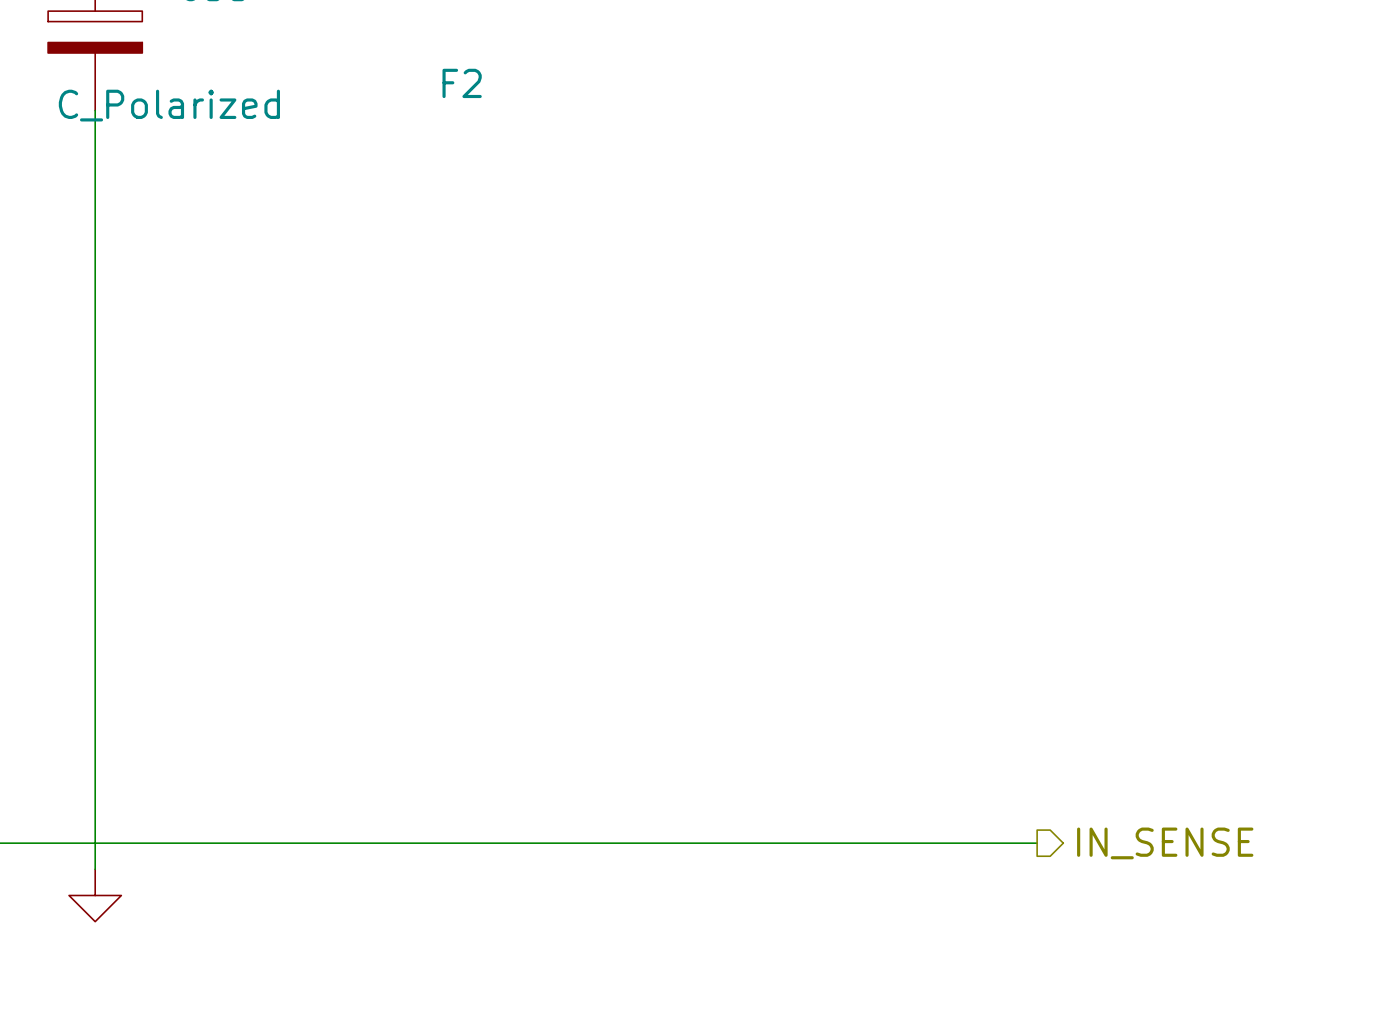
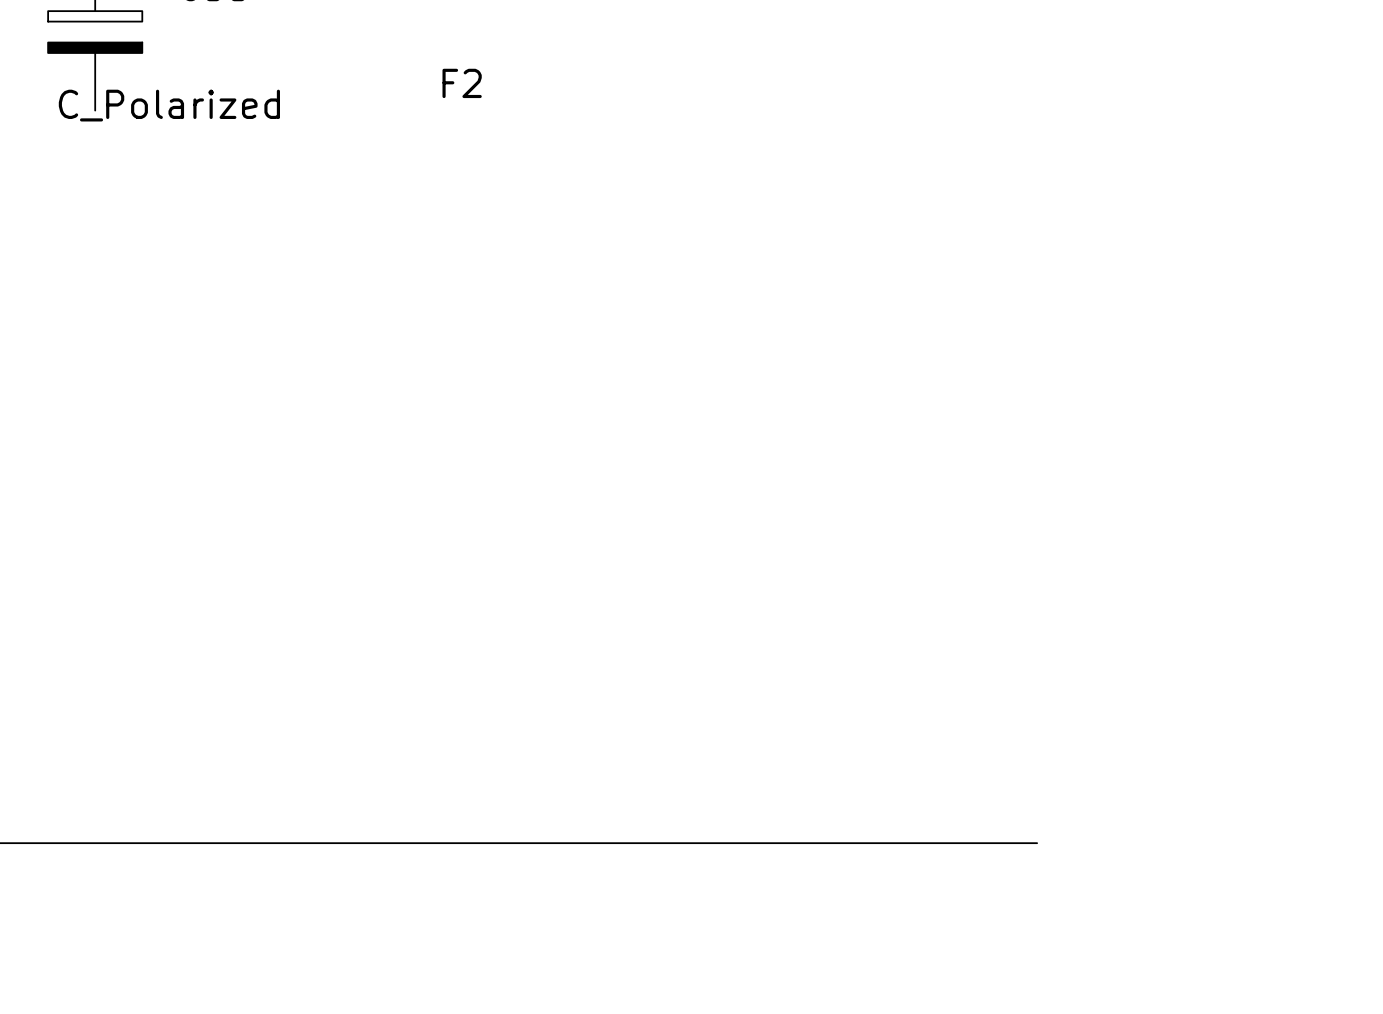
wire: (95, 110) (95, 869) -> none
hierarchical label: IN_SENSE (1165, 843) -> none
power symbol: (95, 895) -> none

